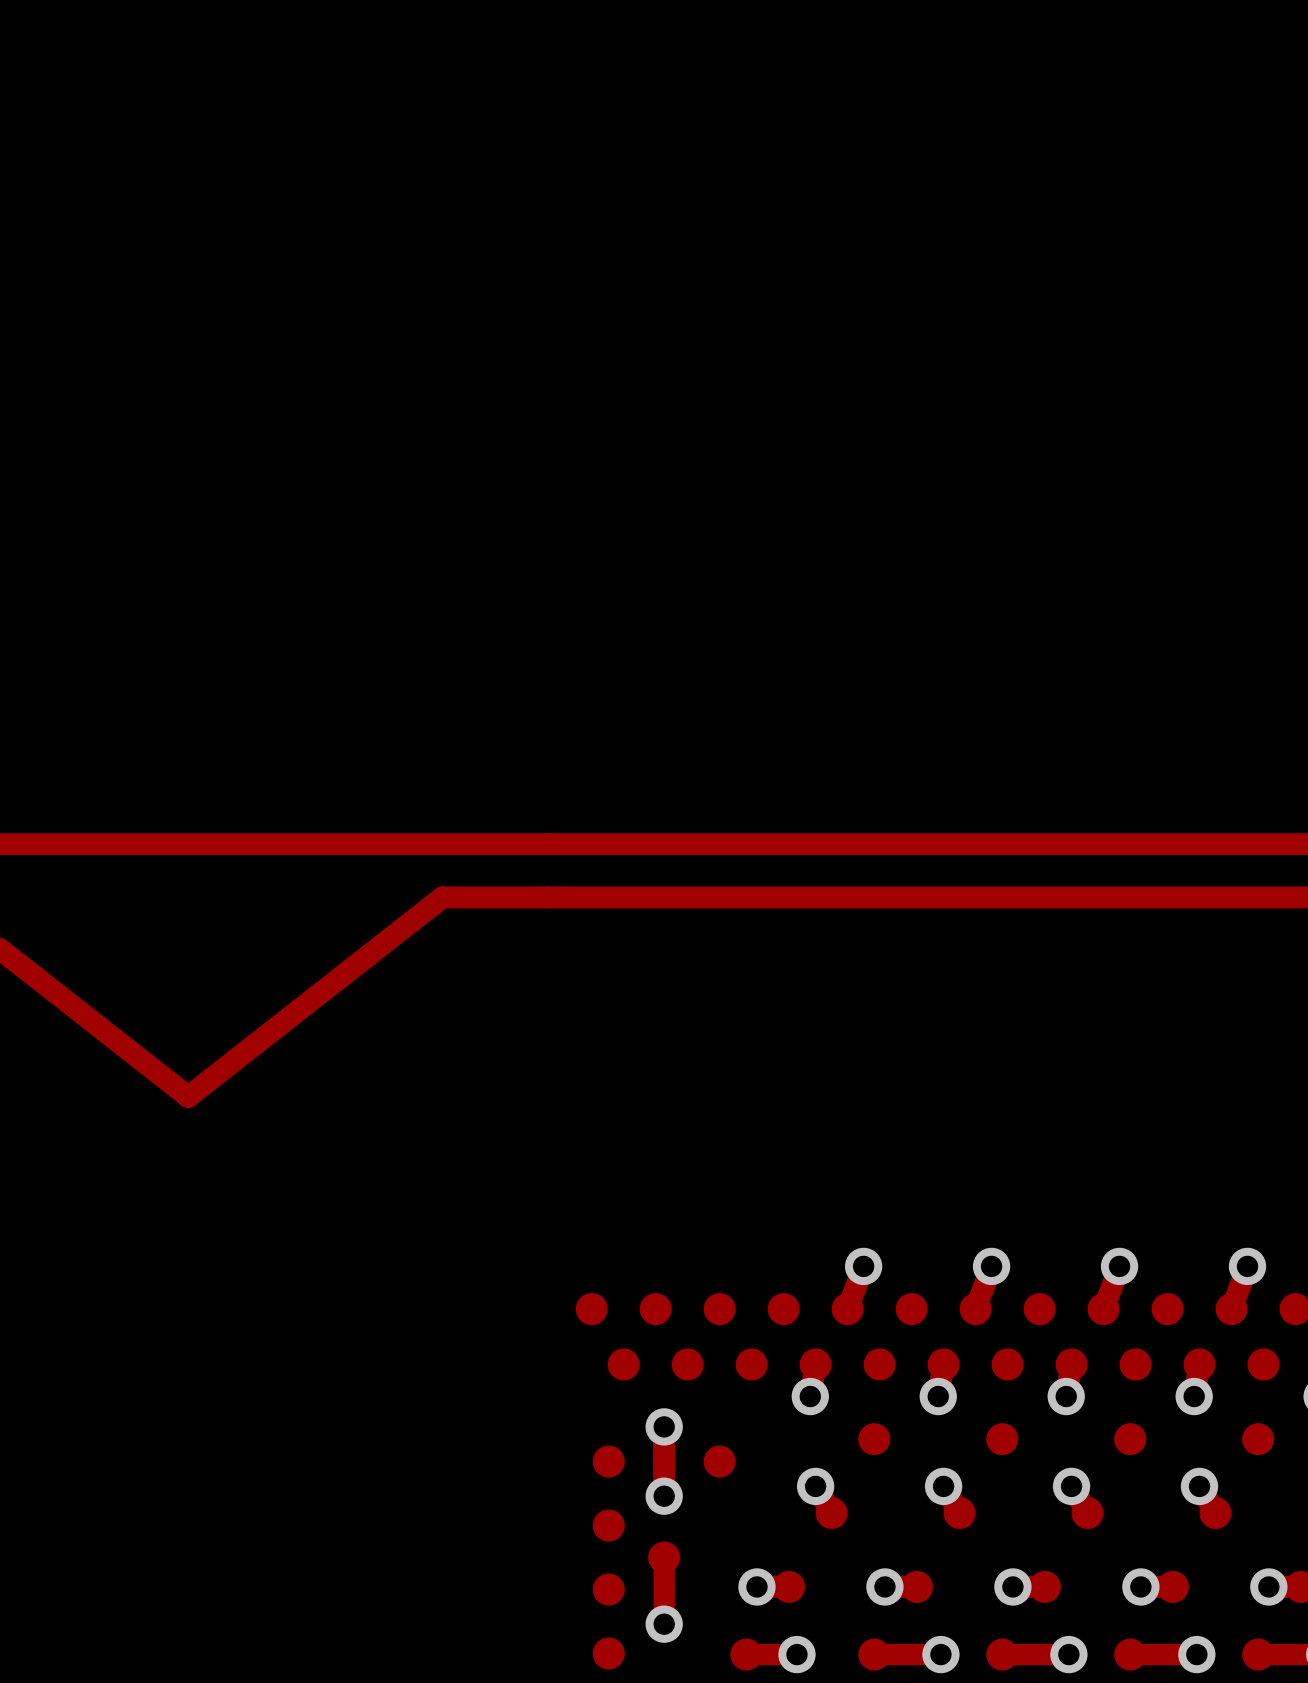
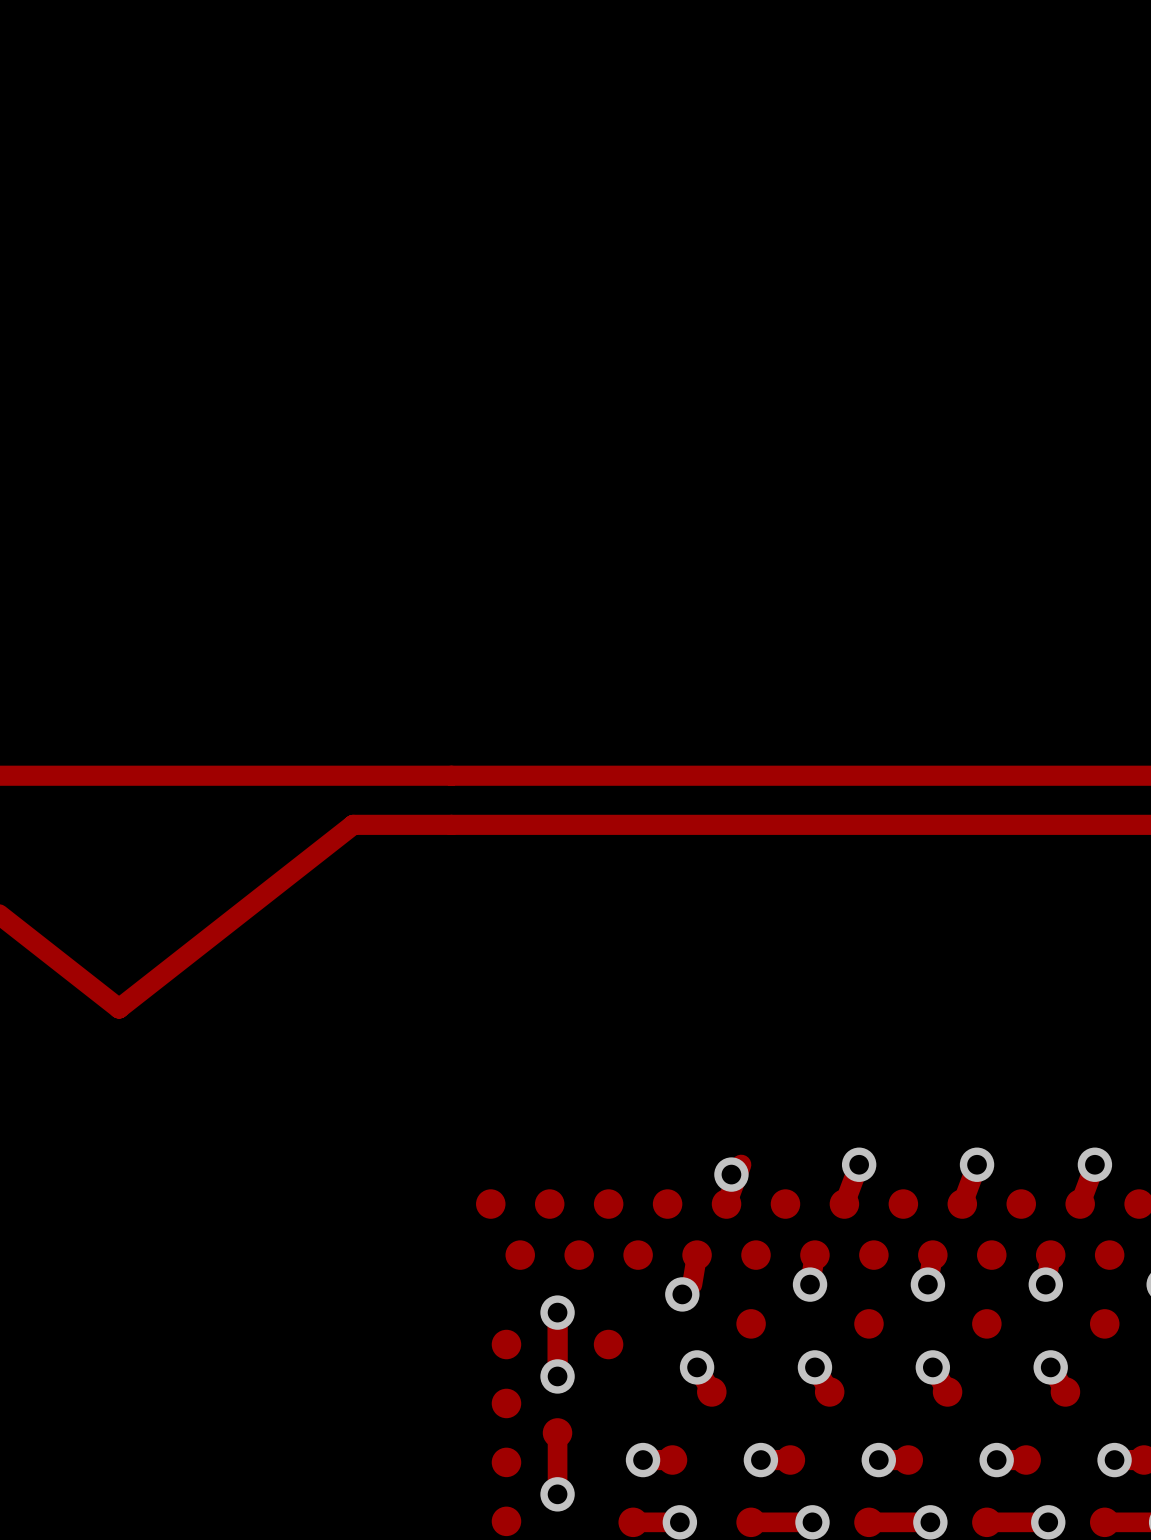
via position: (863, 1266) -> (731, 1174)
via position: (810, 1396) -> (682, 1294)

